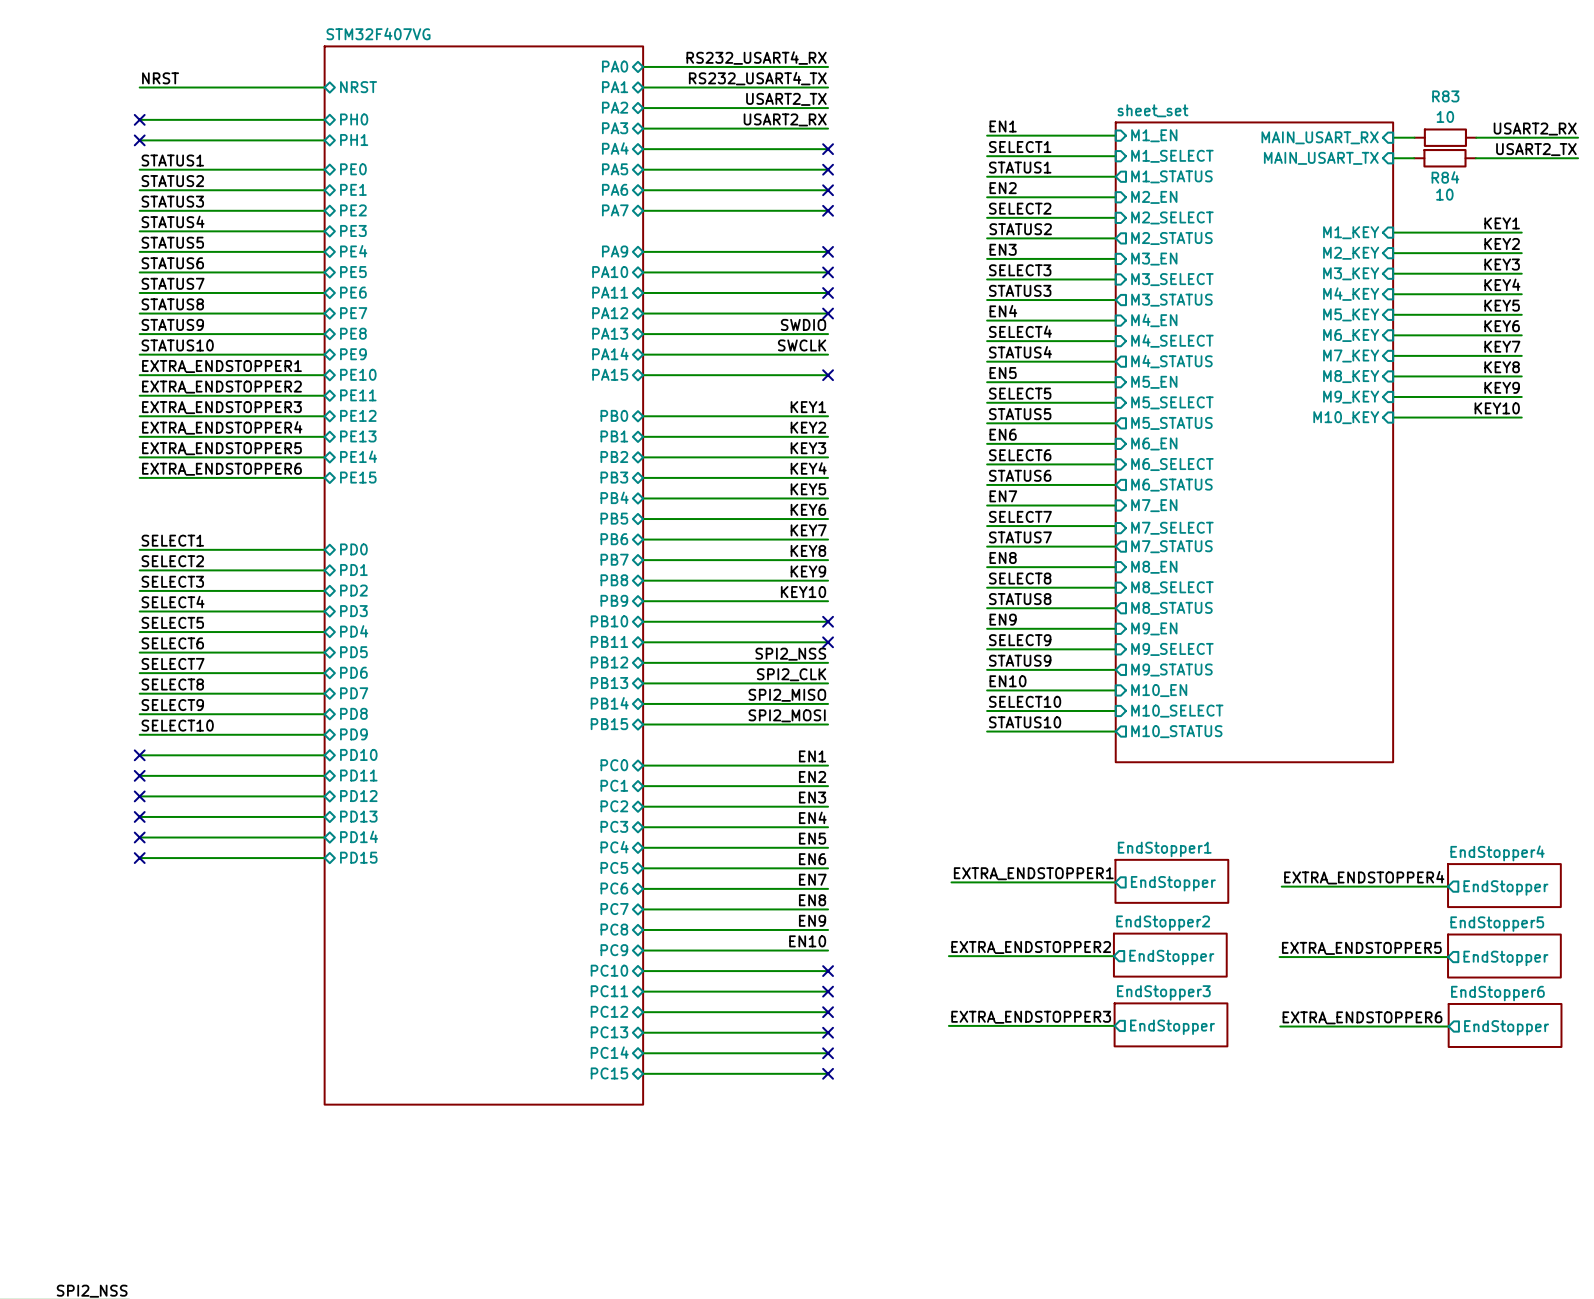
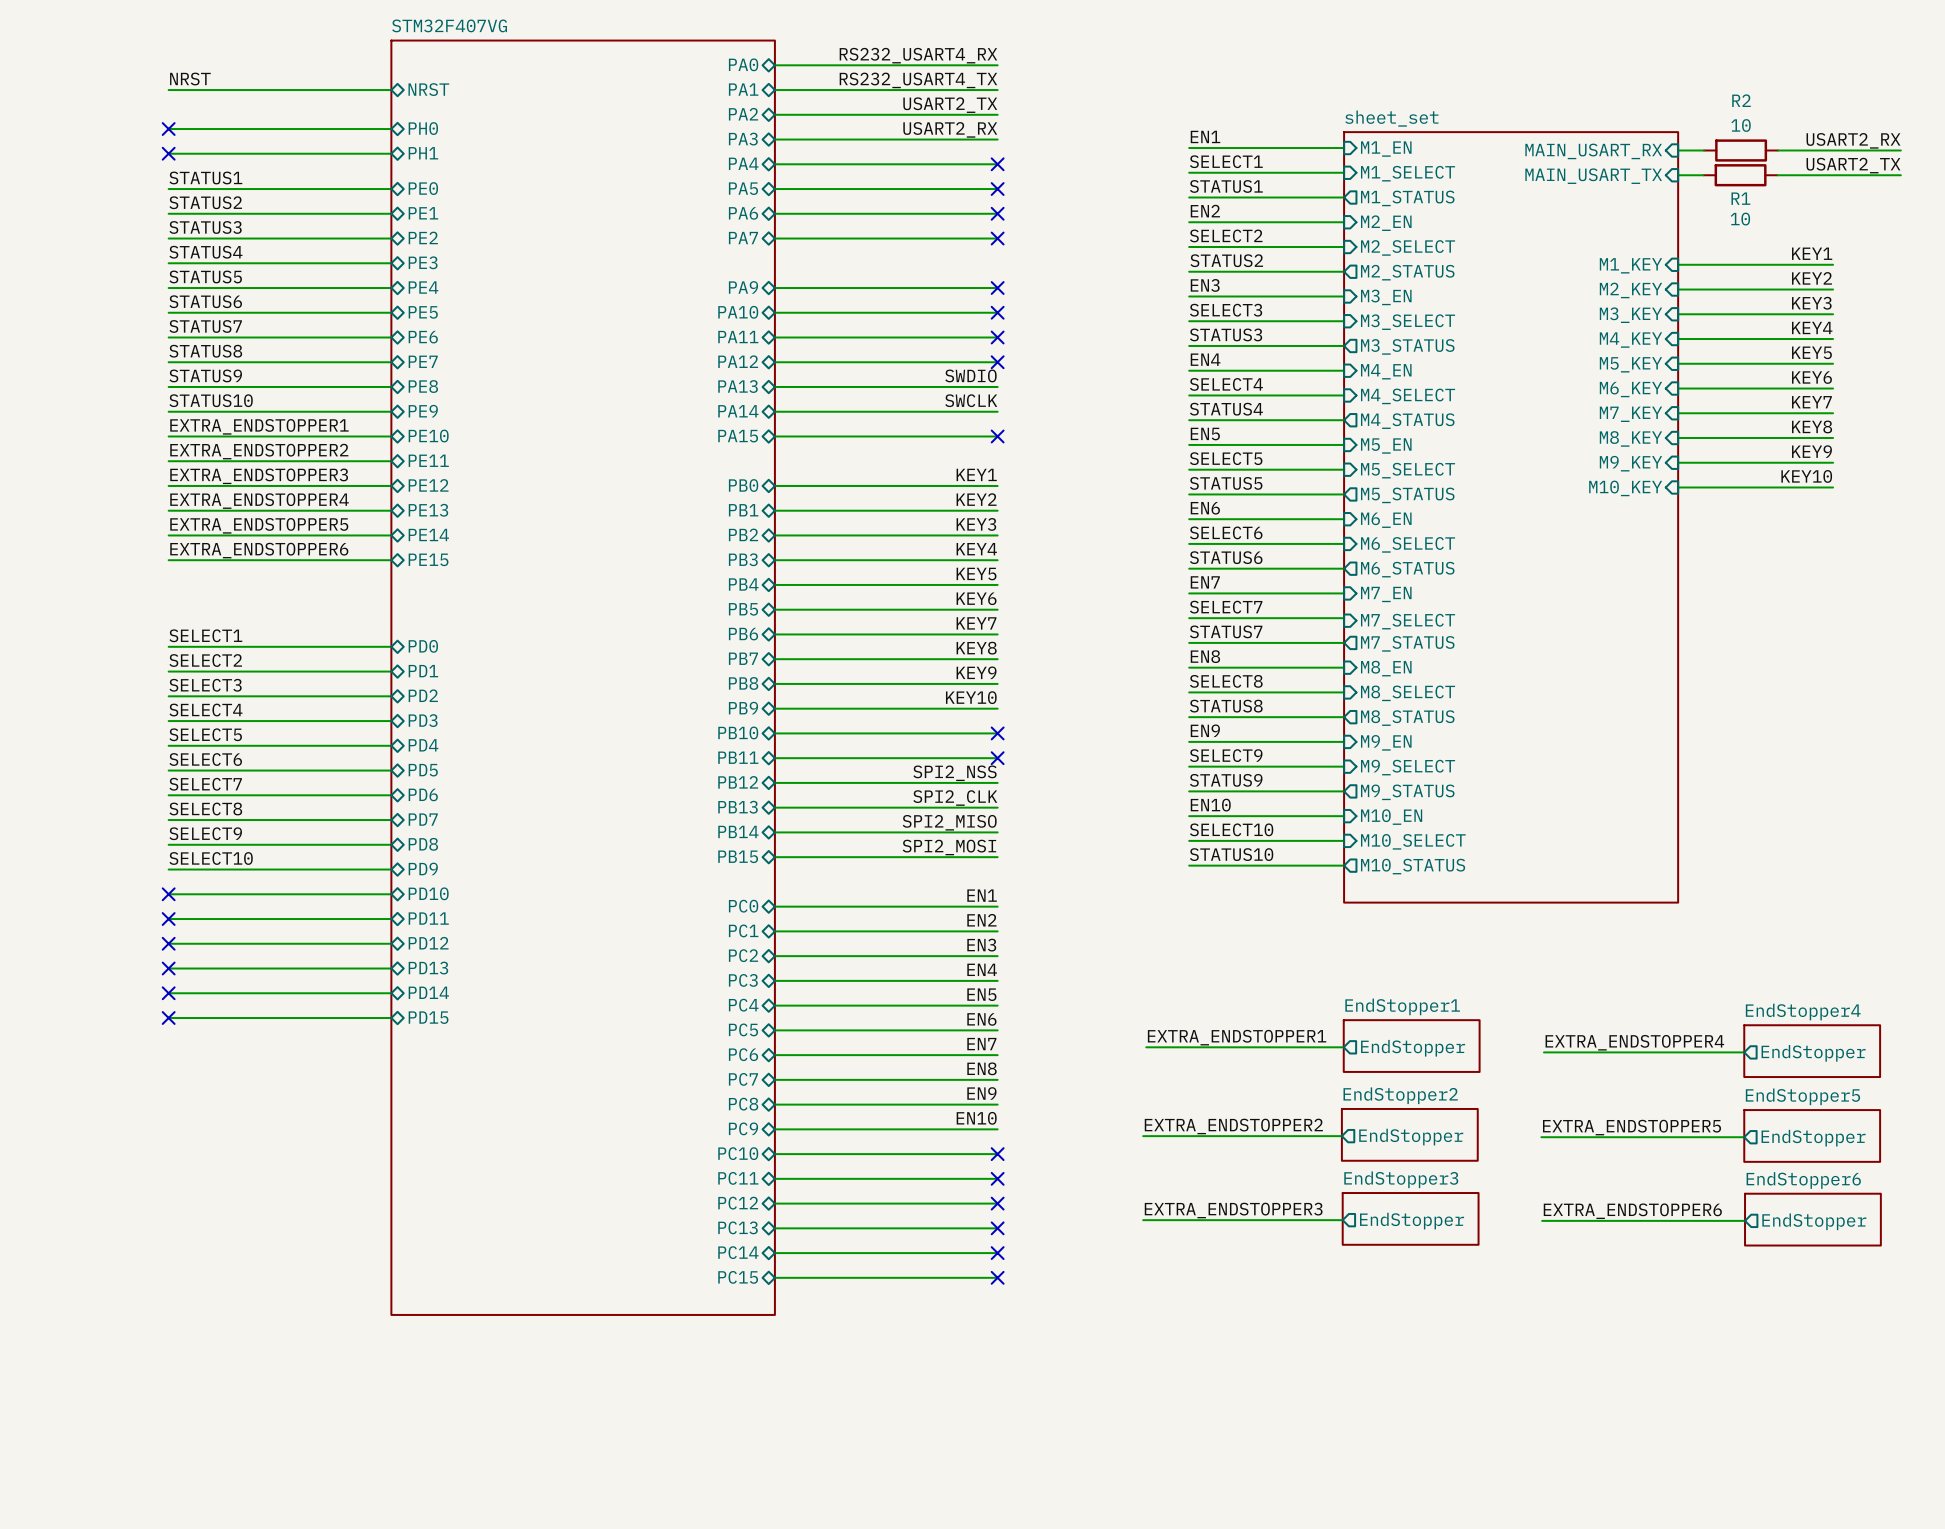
R83 name: R83 (1445, 96) -> R2 (1741, 100)
R84 name: R84 (1445, 177) -> R1 (1740, 198)

